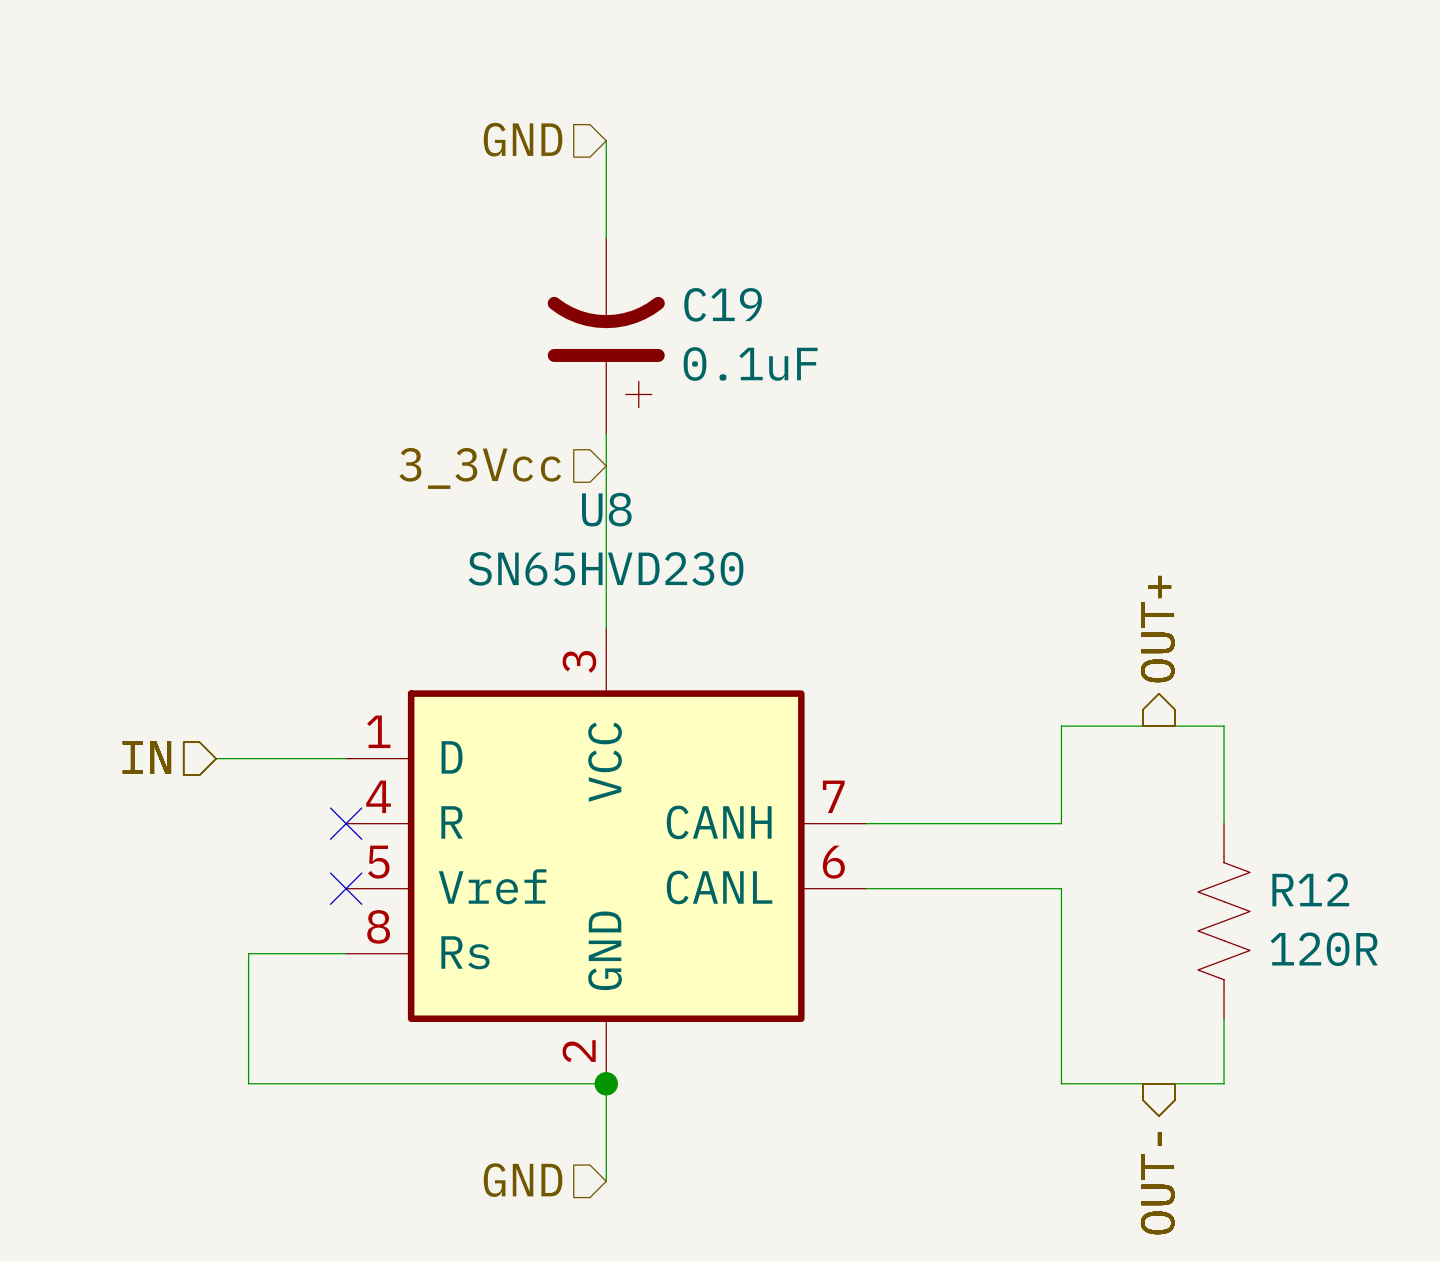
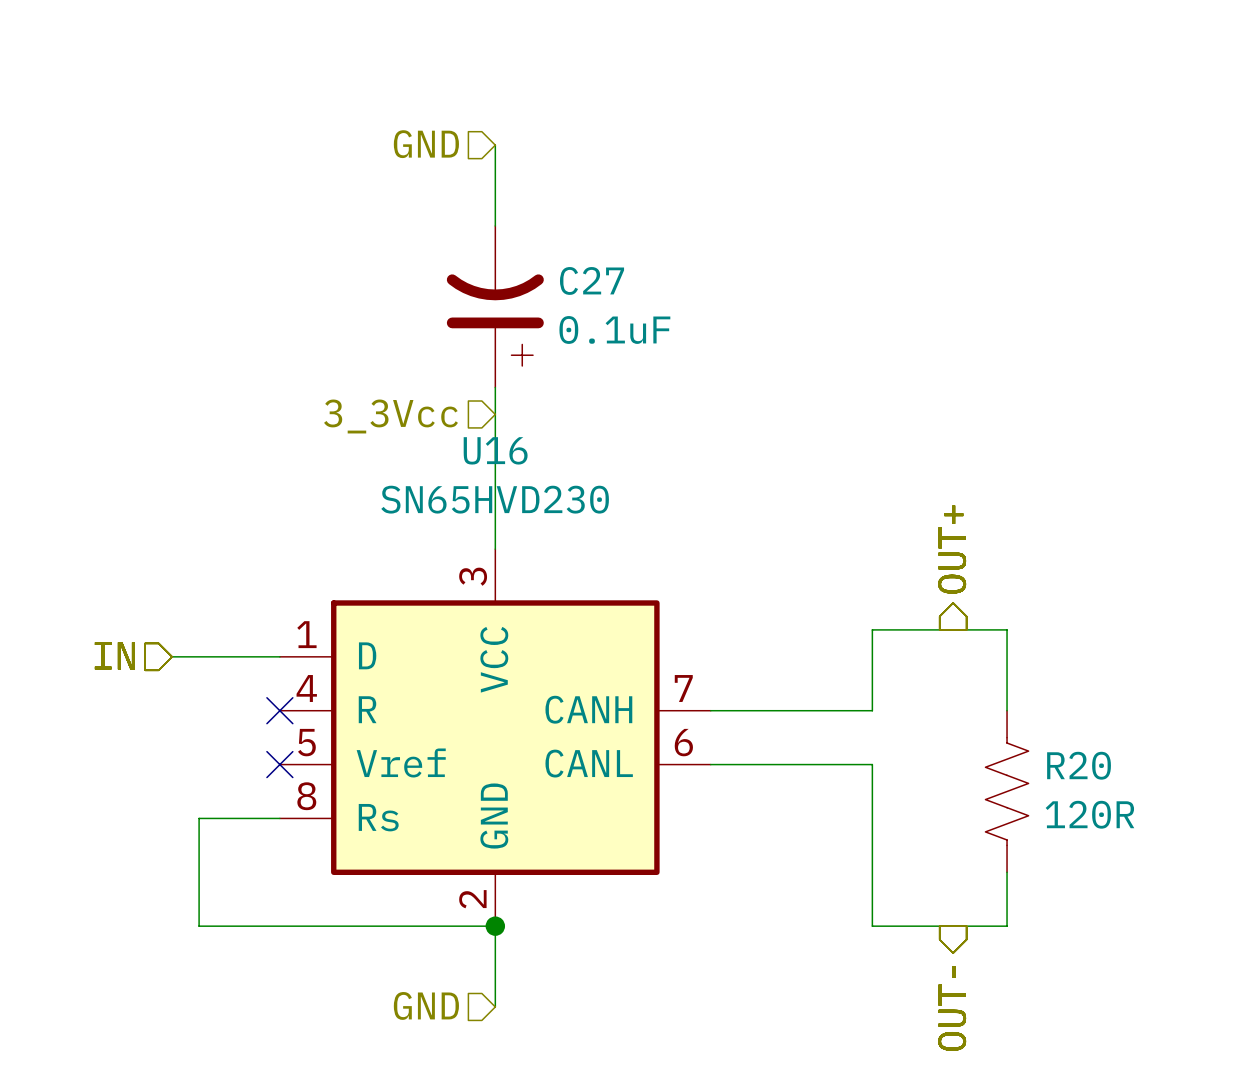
C19 name: C19 (723, 304) -> C27 (592, 280)
U8 name: U8 (606, 509) -> U16 (495, 450)
R12 name: R12 (1310, 889) -> R20 (1079, 765)

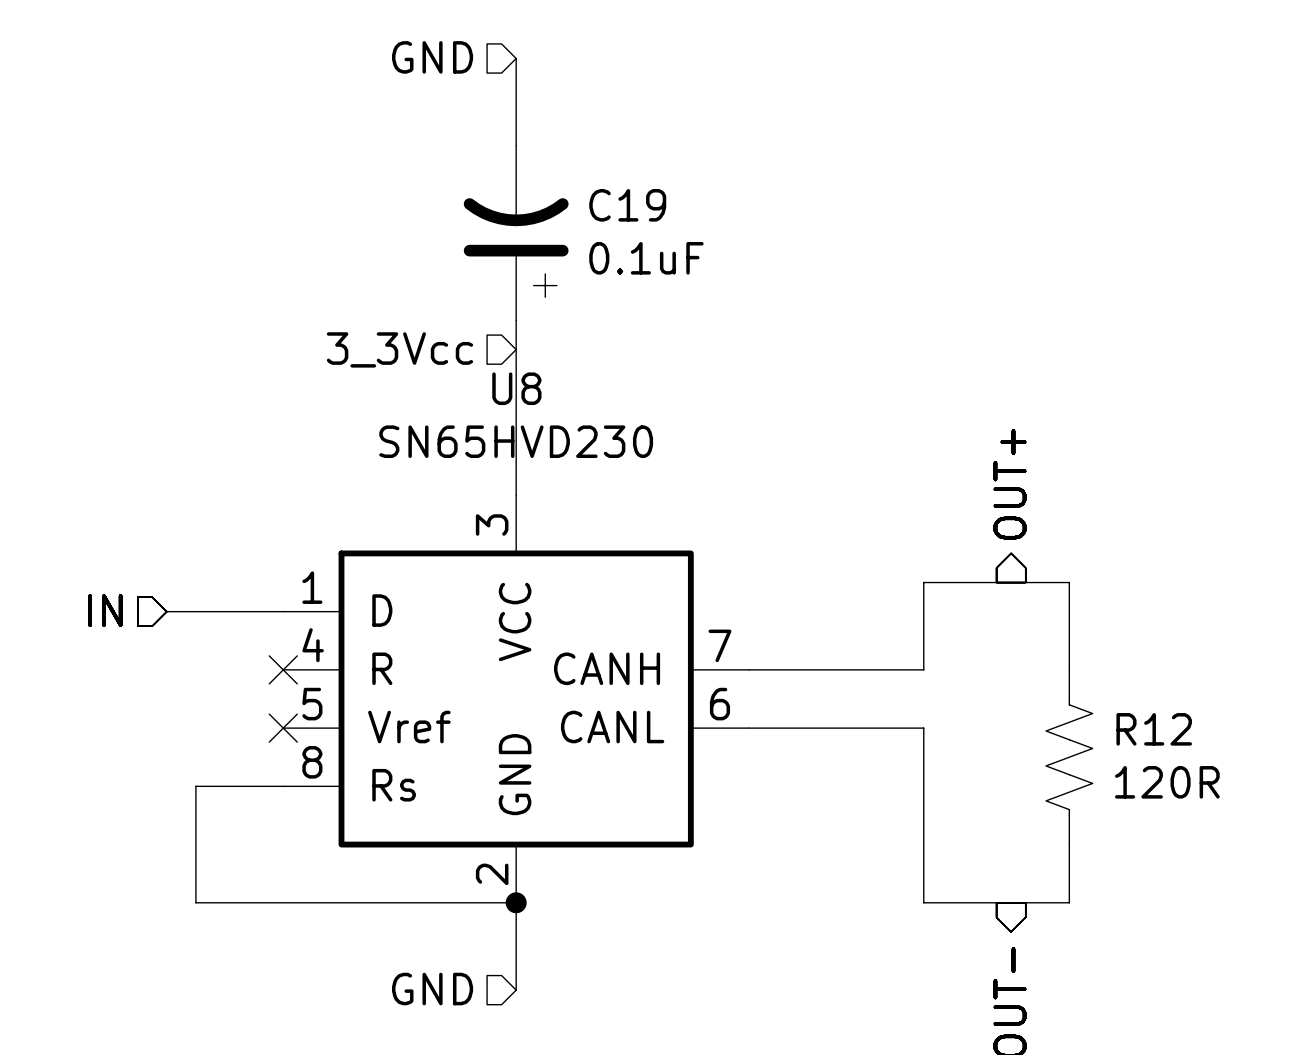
C27 name: C27 (592, 280) -> C19 (627, 205)
U16 name: U16 (495, 450) -> U8 (516, 388)
R20 name: R20 (1079, 765) -> R12 (1154, 729)

